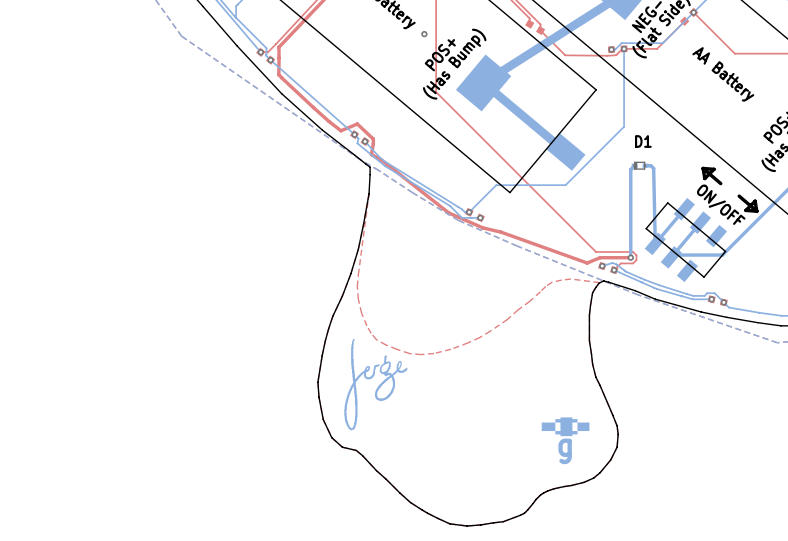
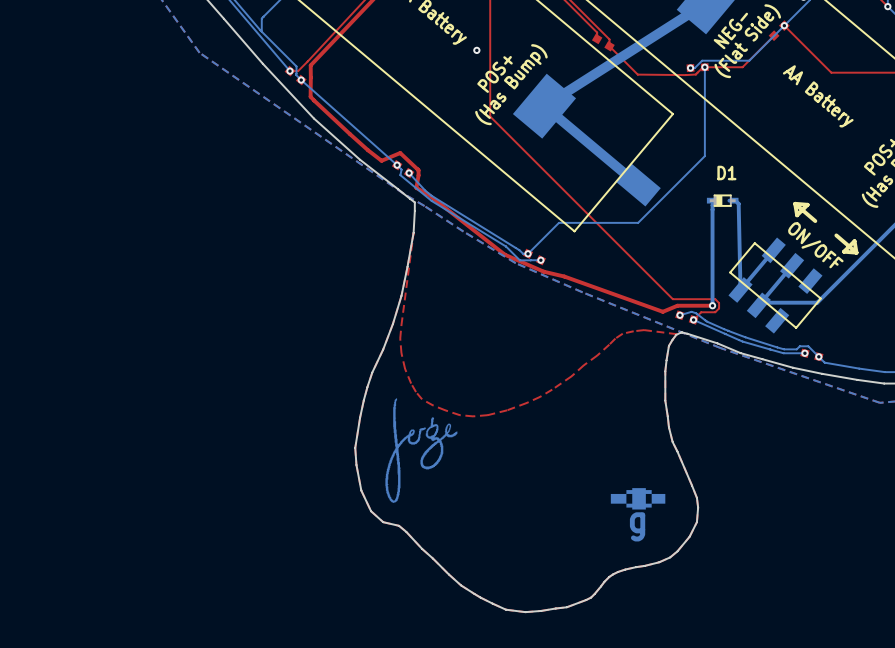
D1 footprint: [631, 161, 649, 170] -> [706, 194, 739, 207]

